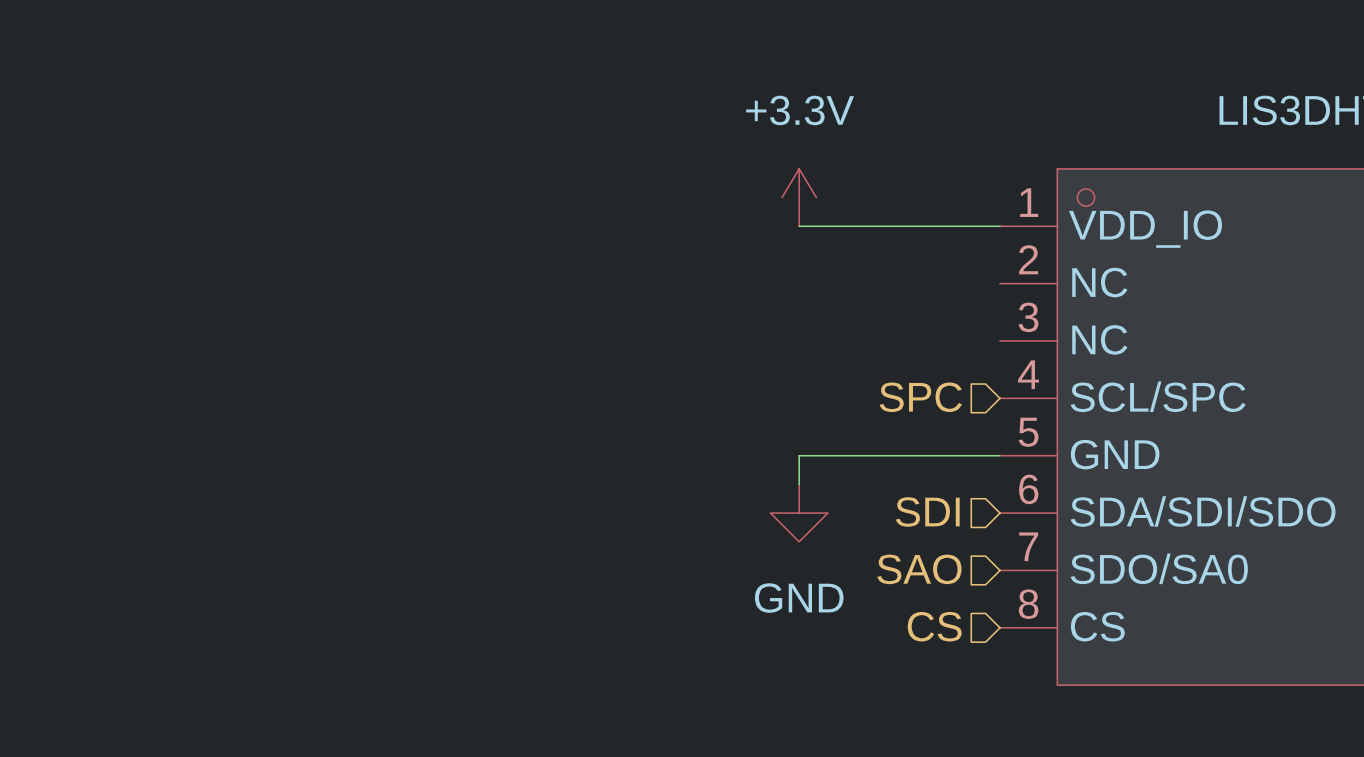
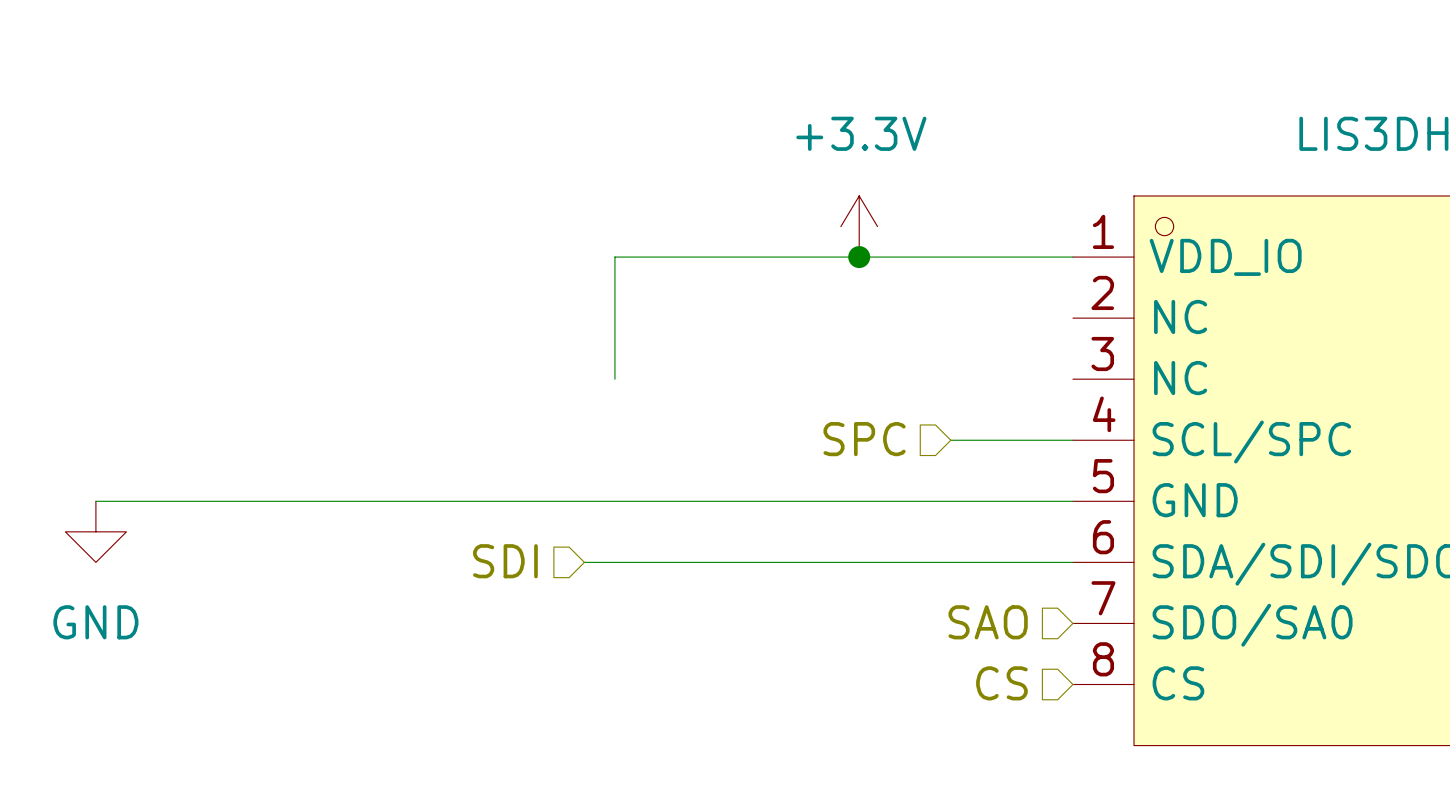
wire: none -> (859, 257) (614, 257) (614, 379)
junction: none -> (859, 257)
hierarchical label position: SPC (920, 397) -> SPC (864, 439)
wire: none -> (950, 440) (1072, 440)
wire: (799, 455) (799, 484) -> (859, 501) (95, 501)
power symbol: none -> GND (95, 531)
hierarchical label position: SDI (927, 512) -> SDI (505, 561)
wire: none -> (584, 562) (1072, 562)
power symbol: GND (799, 513) -> none

